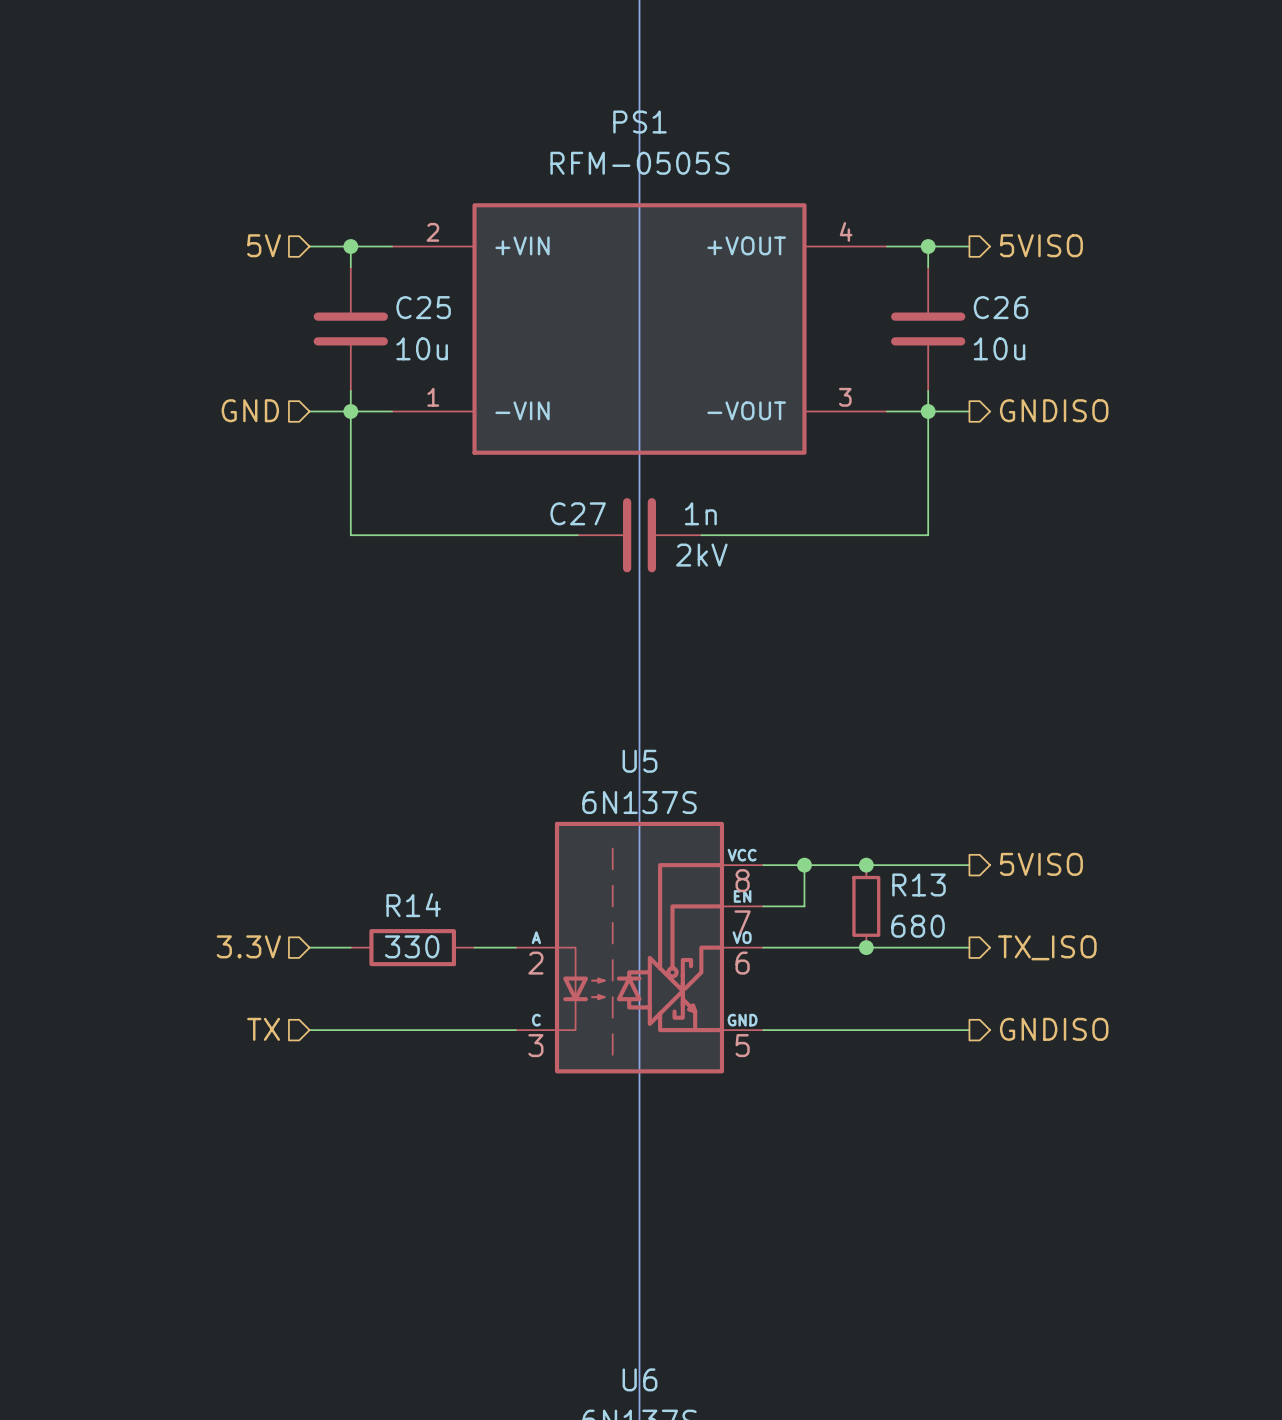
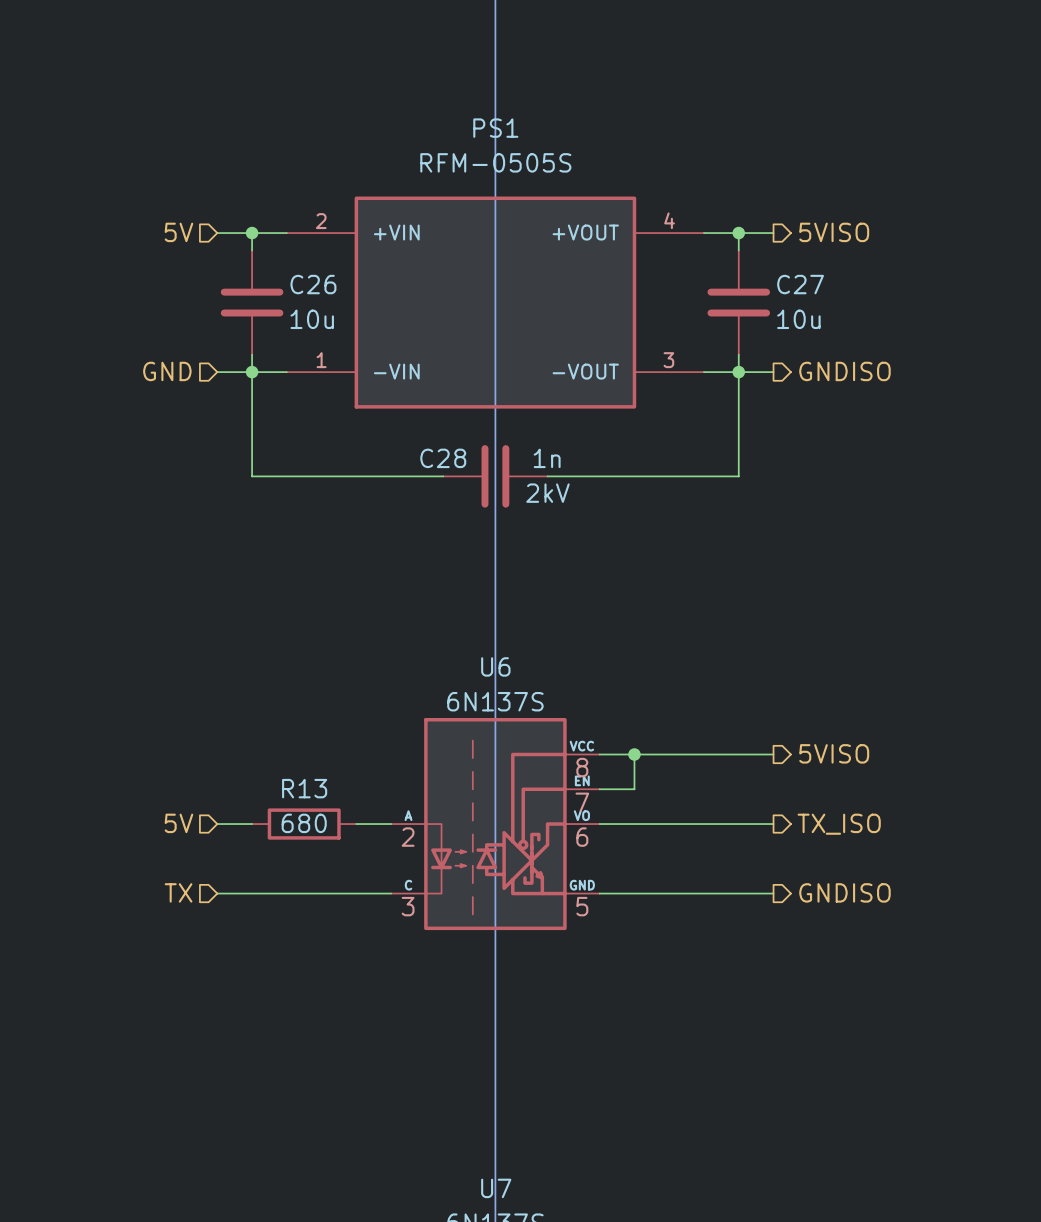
C25 name: C25 (423, 307) -> C26 (313, 284)
C26 name: C26 (1001, 307) -> C27 (800, 284)
C27 name: C27 (578, 513) -> C28 (443, 458)
U5 name: U5 (639, 761) -> U6 (495, 666)
junction: (866, 865) -> none
R14 name: R14 (413, 905) -> R13 (304, 788)
R13: 680 (866, 906) -> none
hierarchical label: 3.3V (248, 946) -> 5V (178, 823)
R14 value: 330 (412, 946) -> 680 (304, 823)
junction: (866, 947) -> none
U6 name: U6 (639, 1379) -> U7 (496, 1188)

